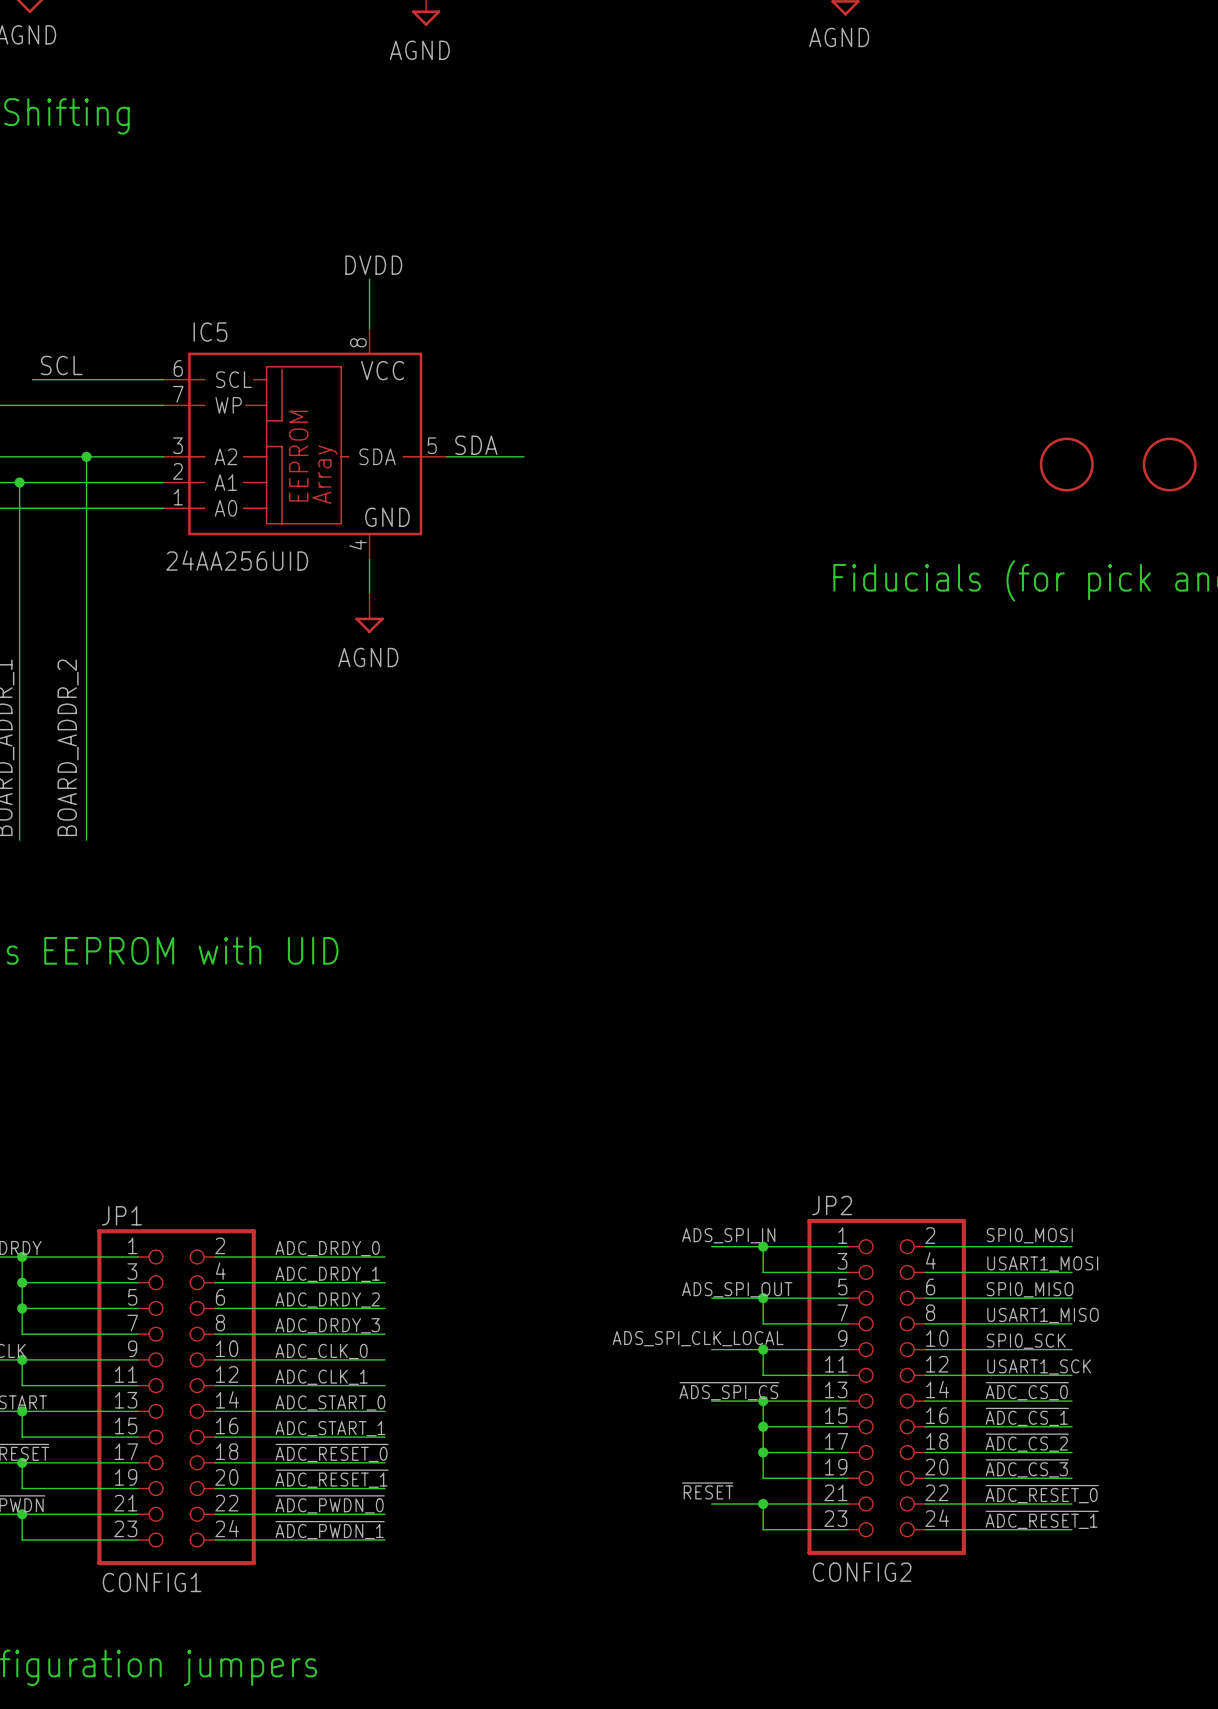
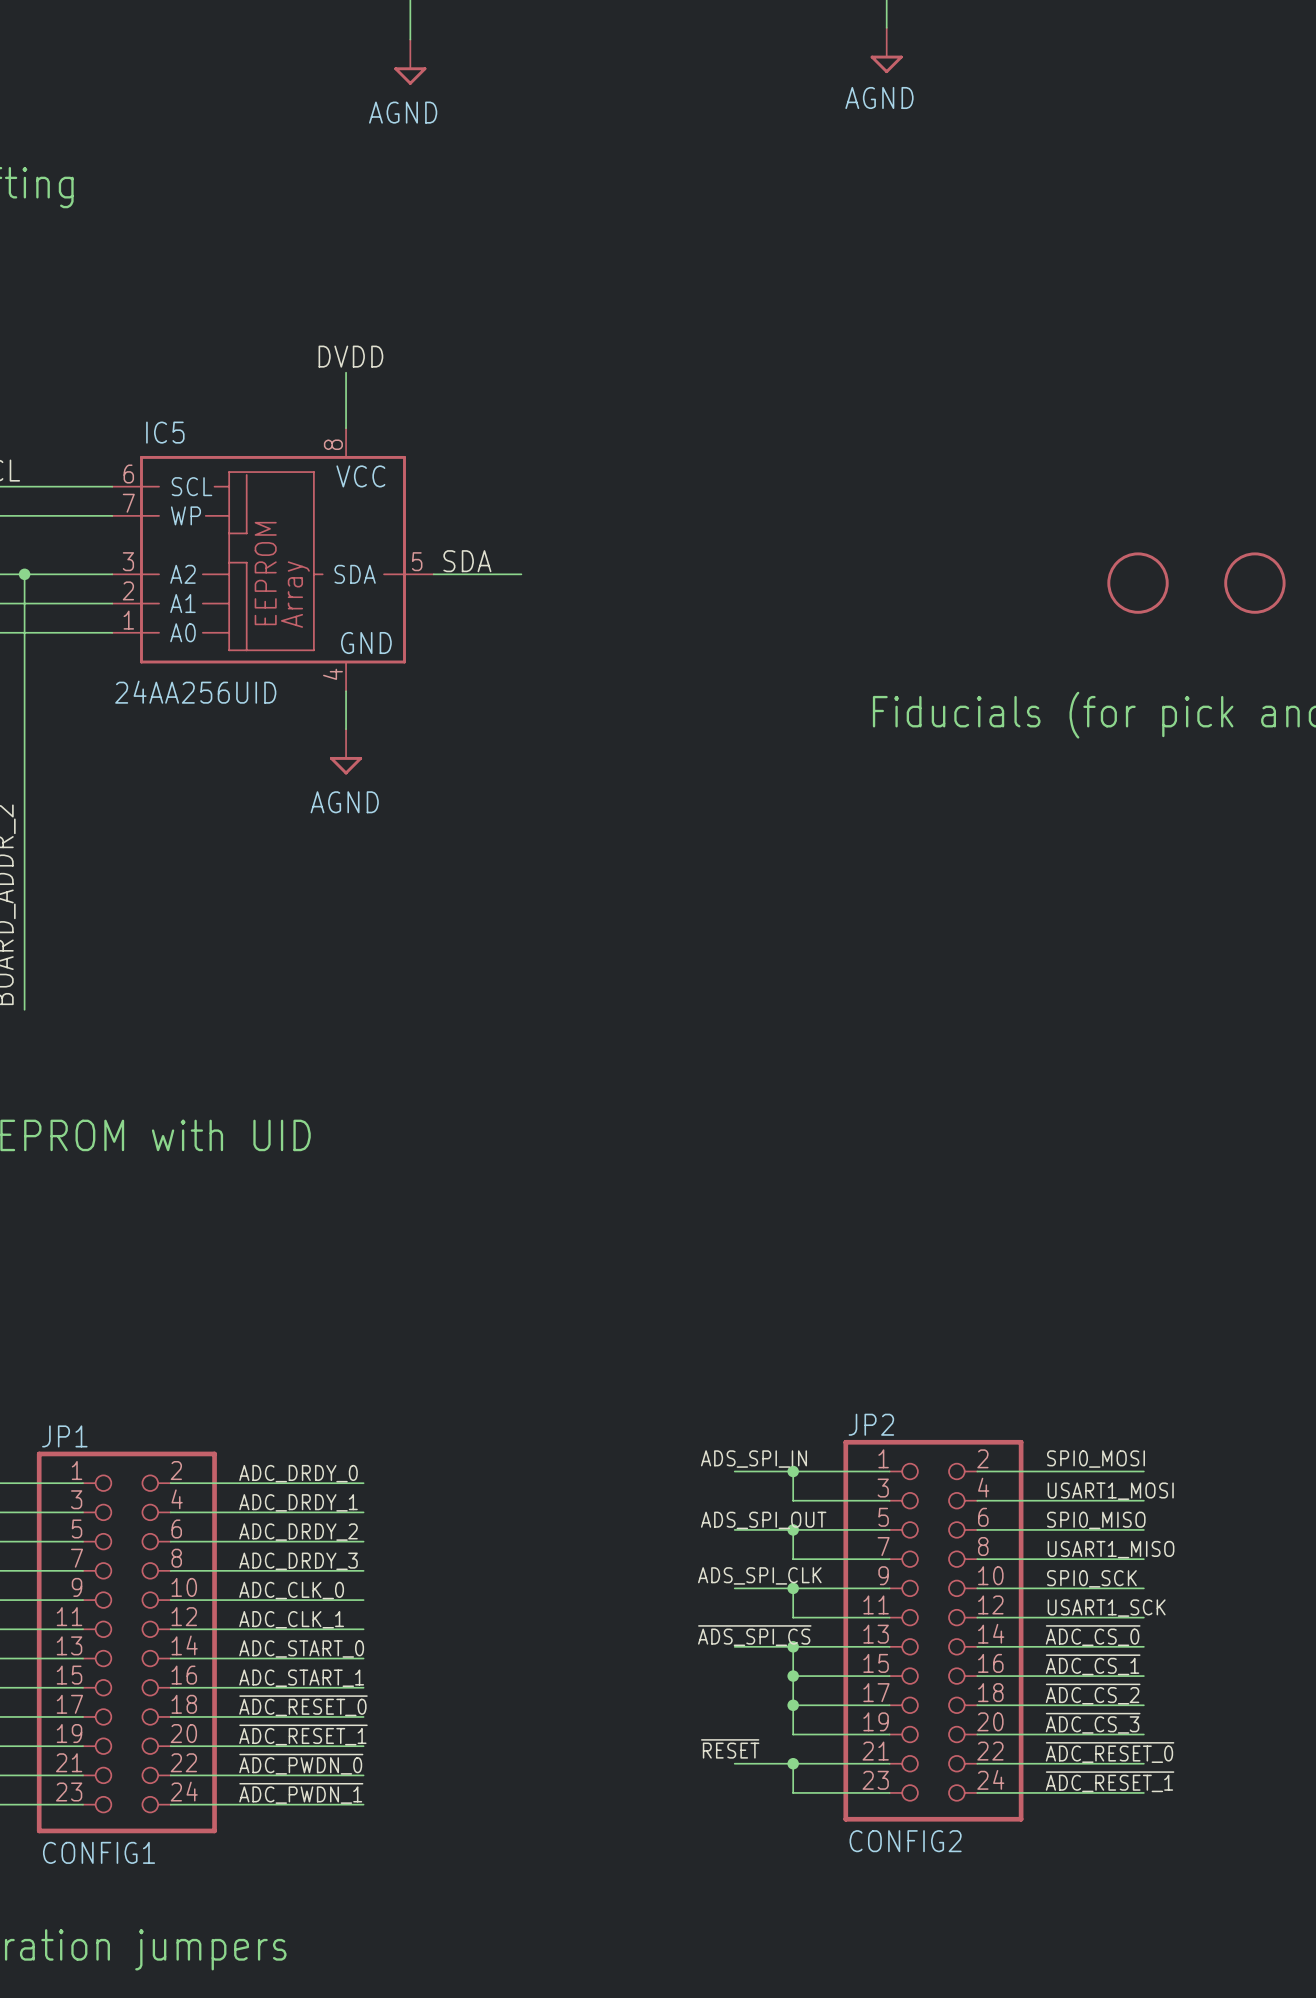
label: ADS_SPI_CLK_LOCAL (698, 1338) -> ADS_SPI_CLK (759, 1575)

